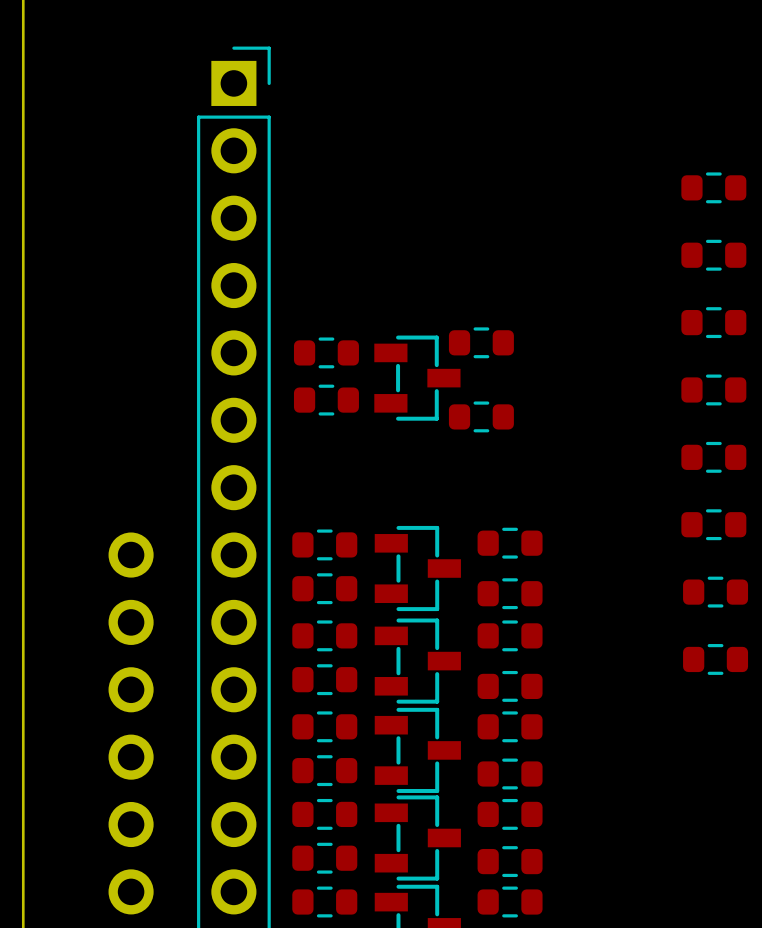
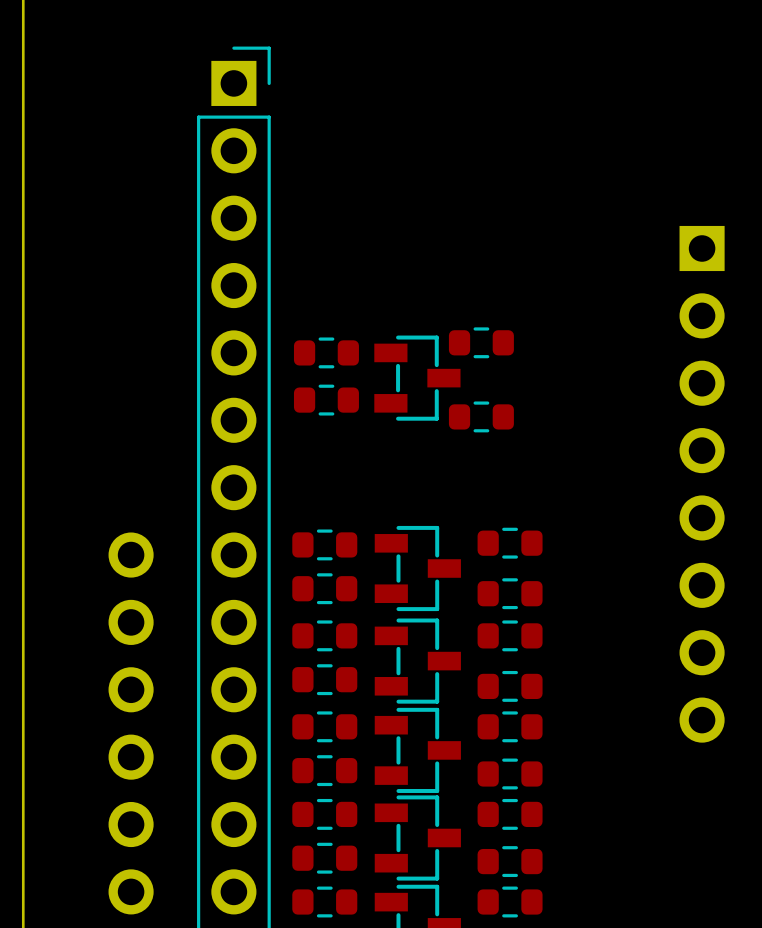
part: (713, 187) -> none
part: (713, 255) -> none
part: (713, 322) -> none
part: (713, 389) -> none
part: (713, 457) -> none
part: none -> (702, 484)
part: (713, 524) -> none
part: (715, 592) -> none
part: (715, 659) -> none

